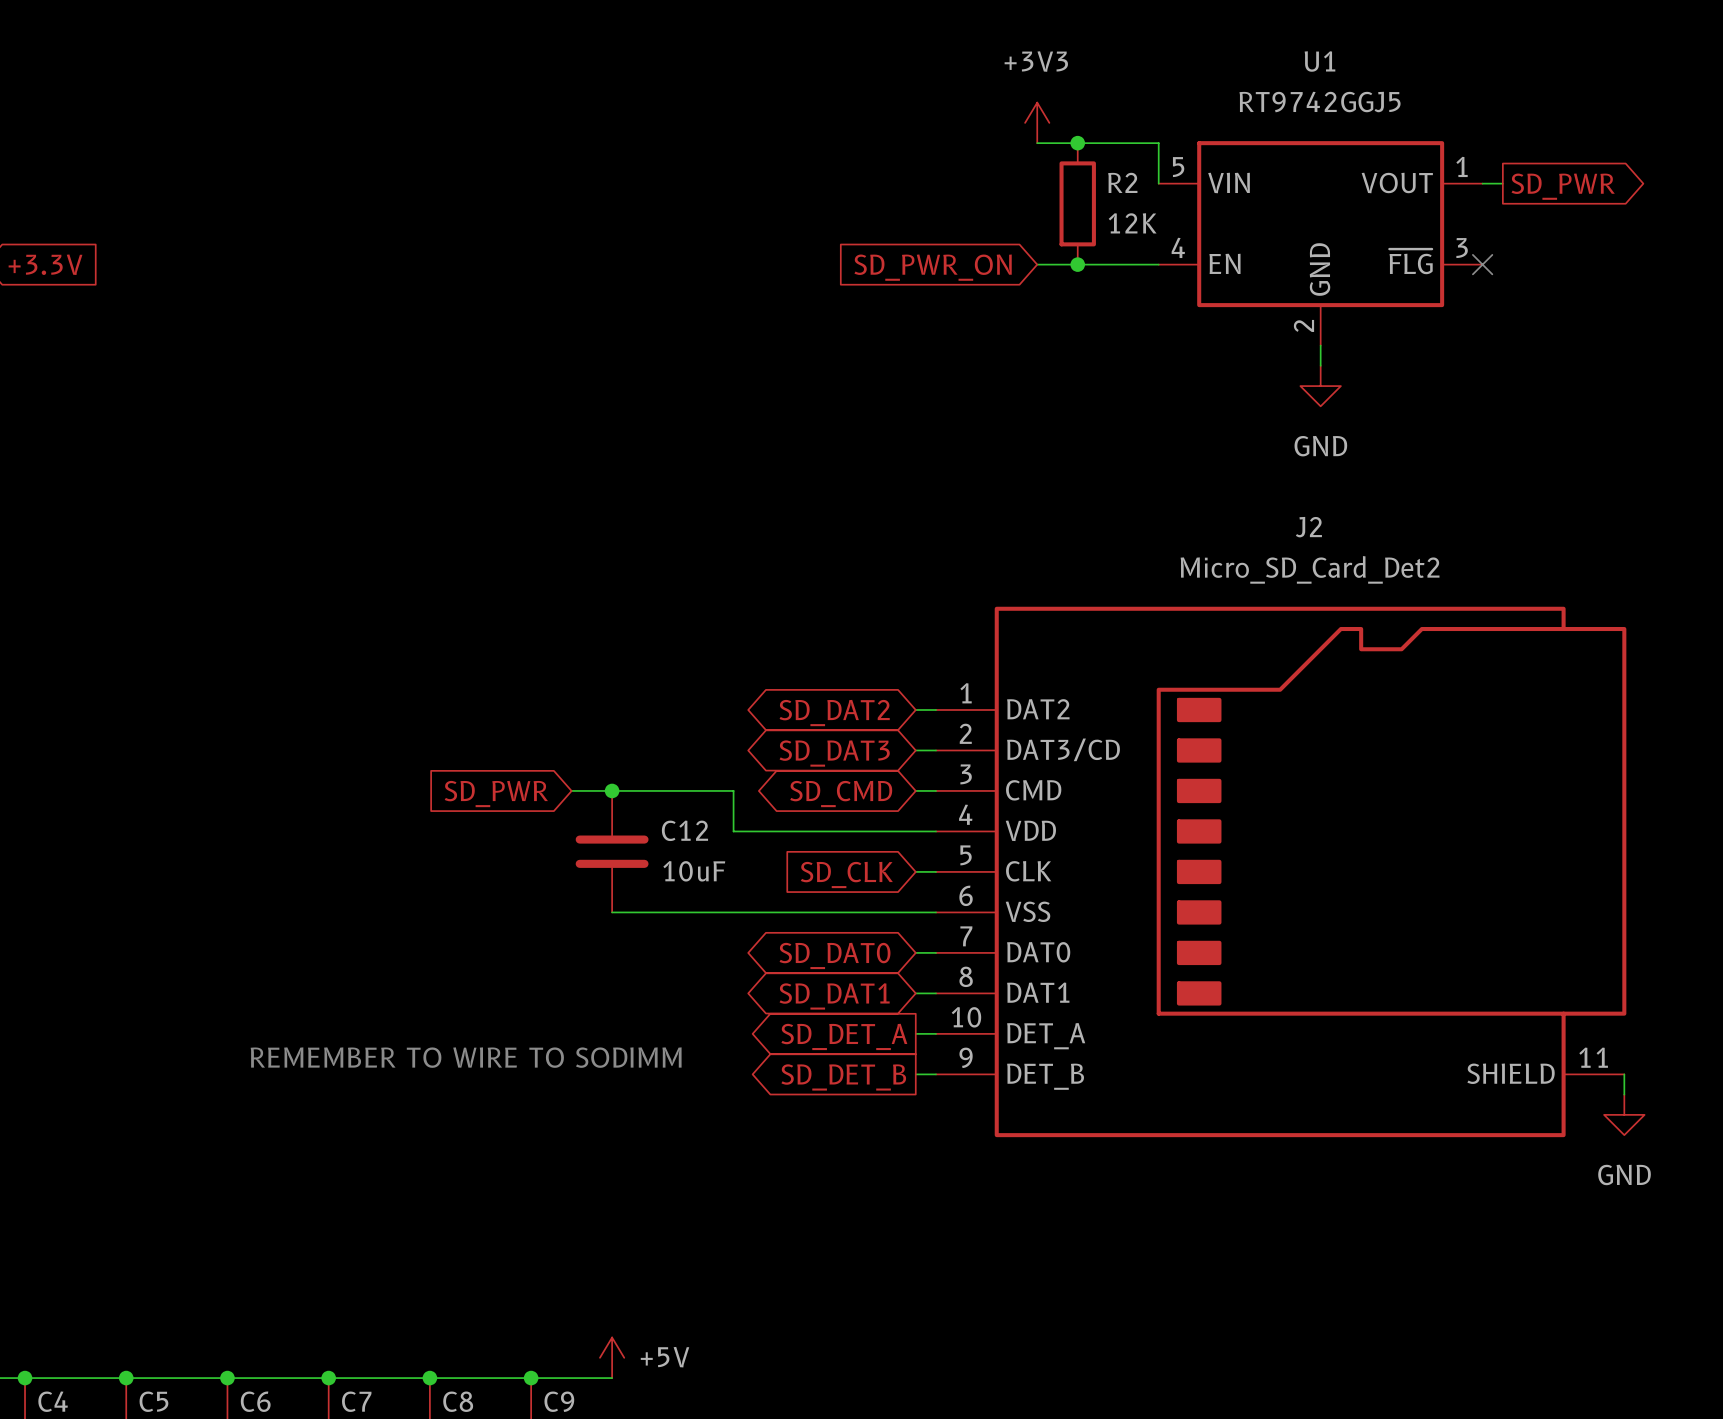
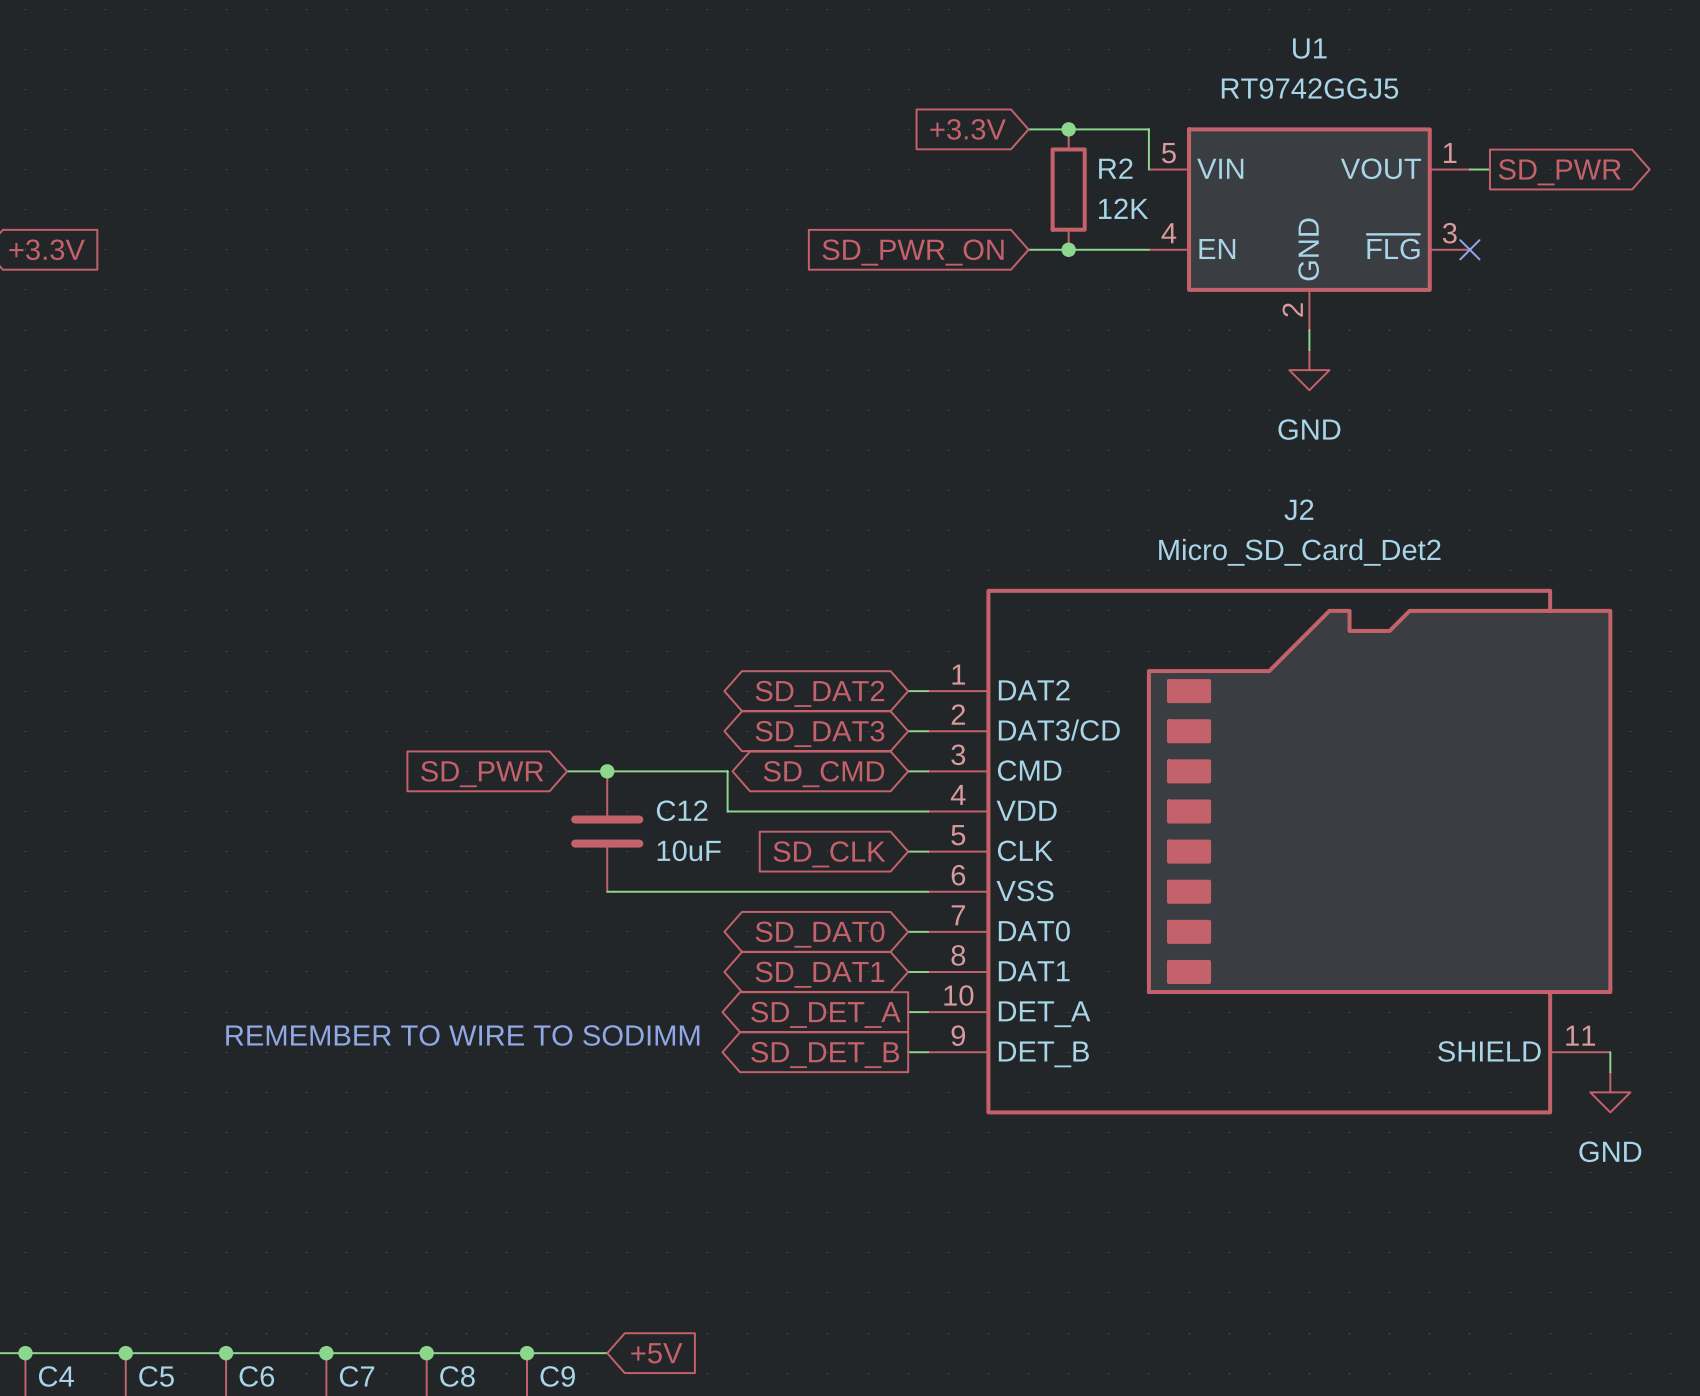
power symbol: +3V3 (1037, 122) -> none
global label: none -> +3.3V (968, 129)
power symbol: +5V (612, 1357) -> none
global label: none -> +5V (656, 1353)

